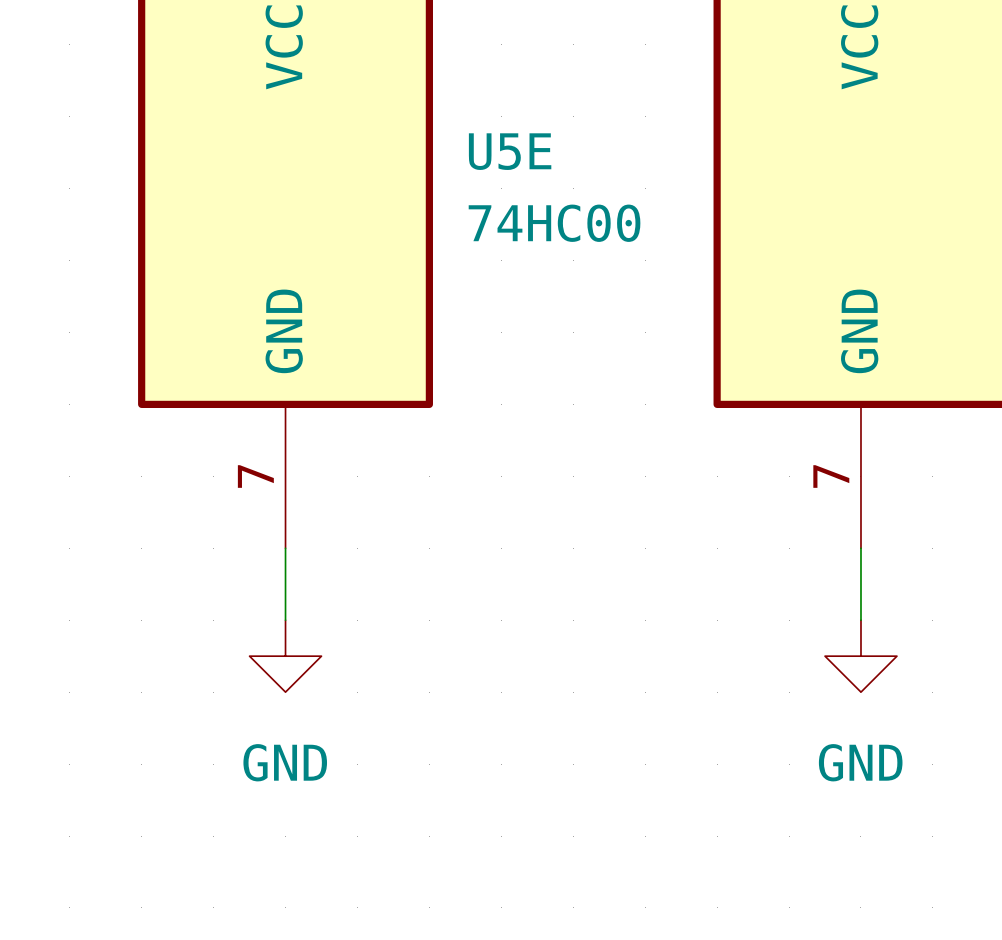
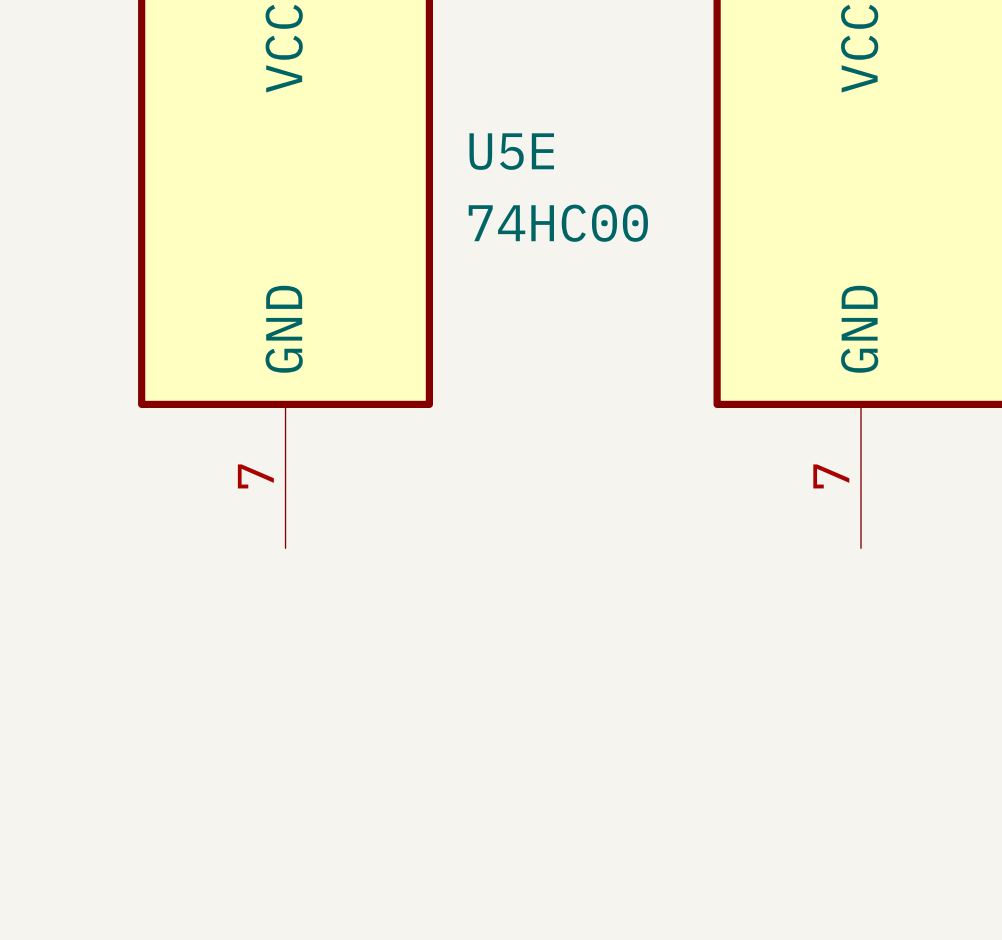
wire: (285, 548) (285, 620) -> none
wire: (860, 548) (860, 620) -> none
power symbol: GND (285, 656) -> none
power symbol: GND (860, 656) -> none

